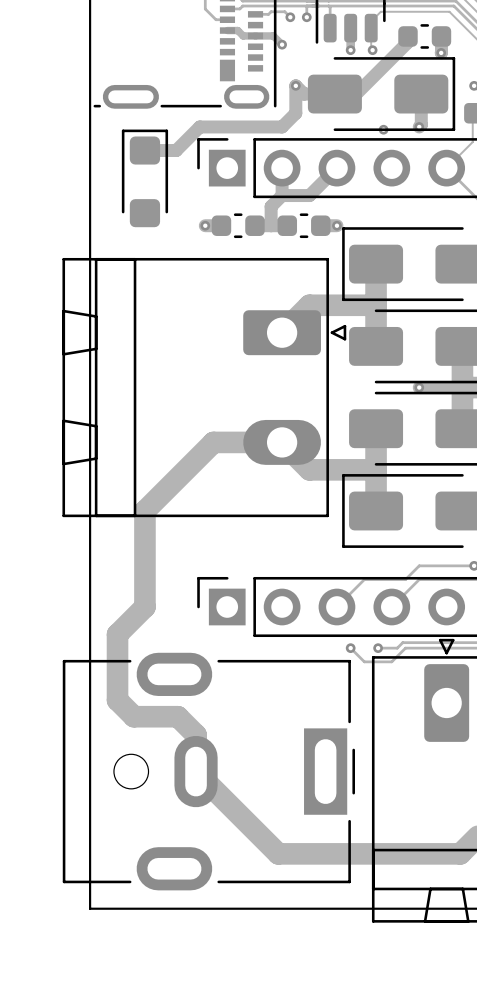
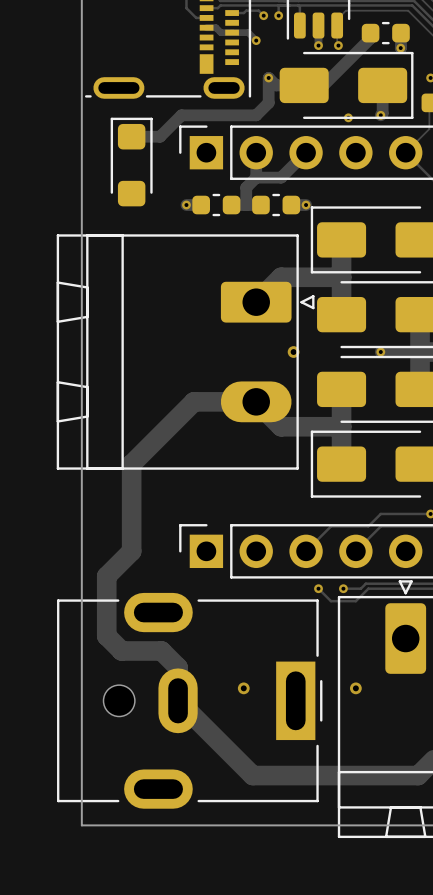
via: none -> (293, 352)
via: none -> (243, 688)
via: none -> (355, 688)

